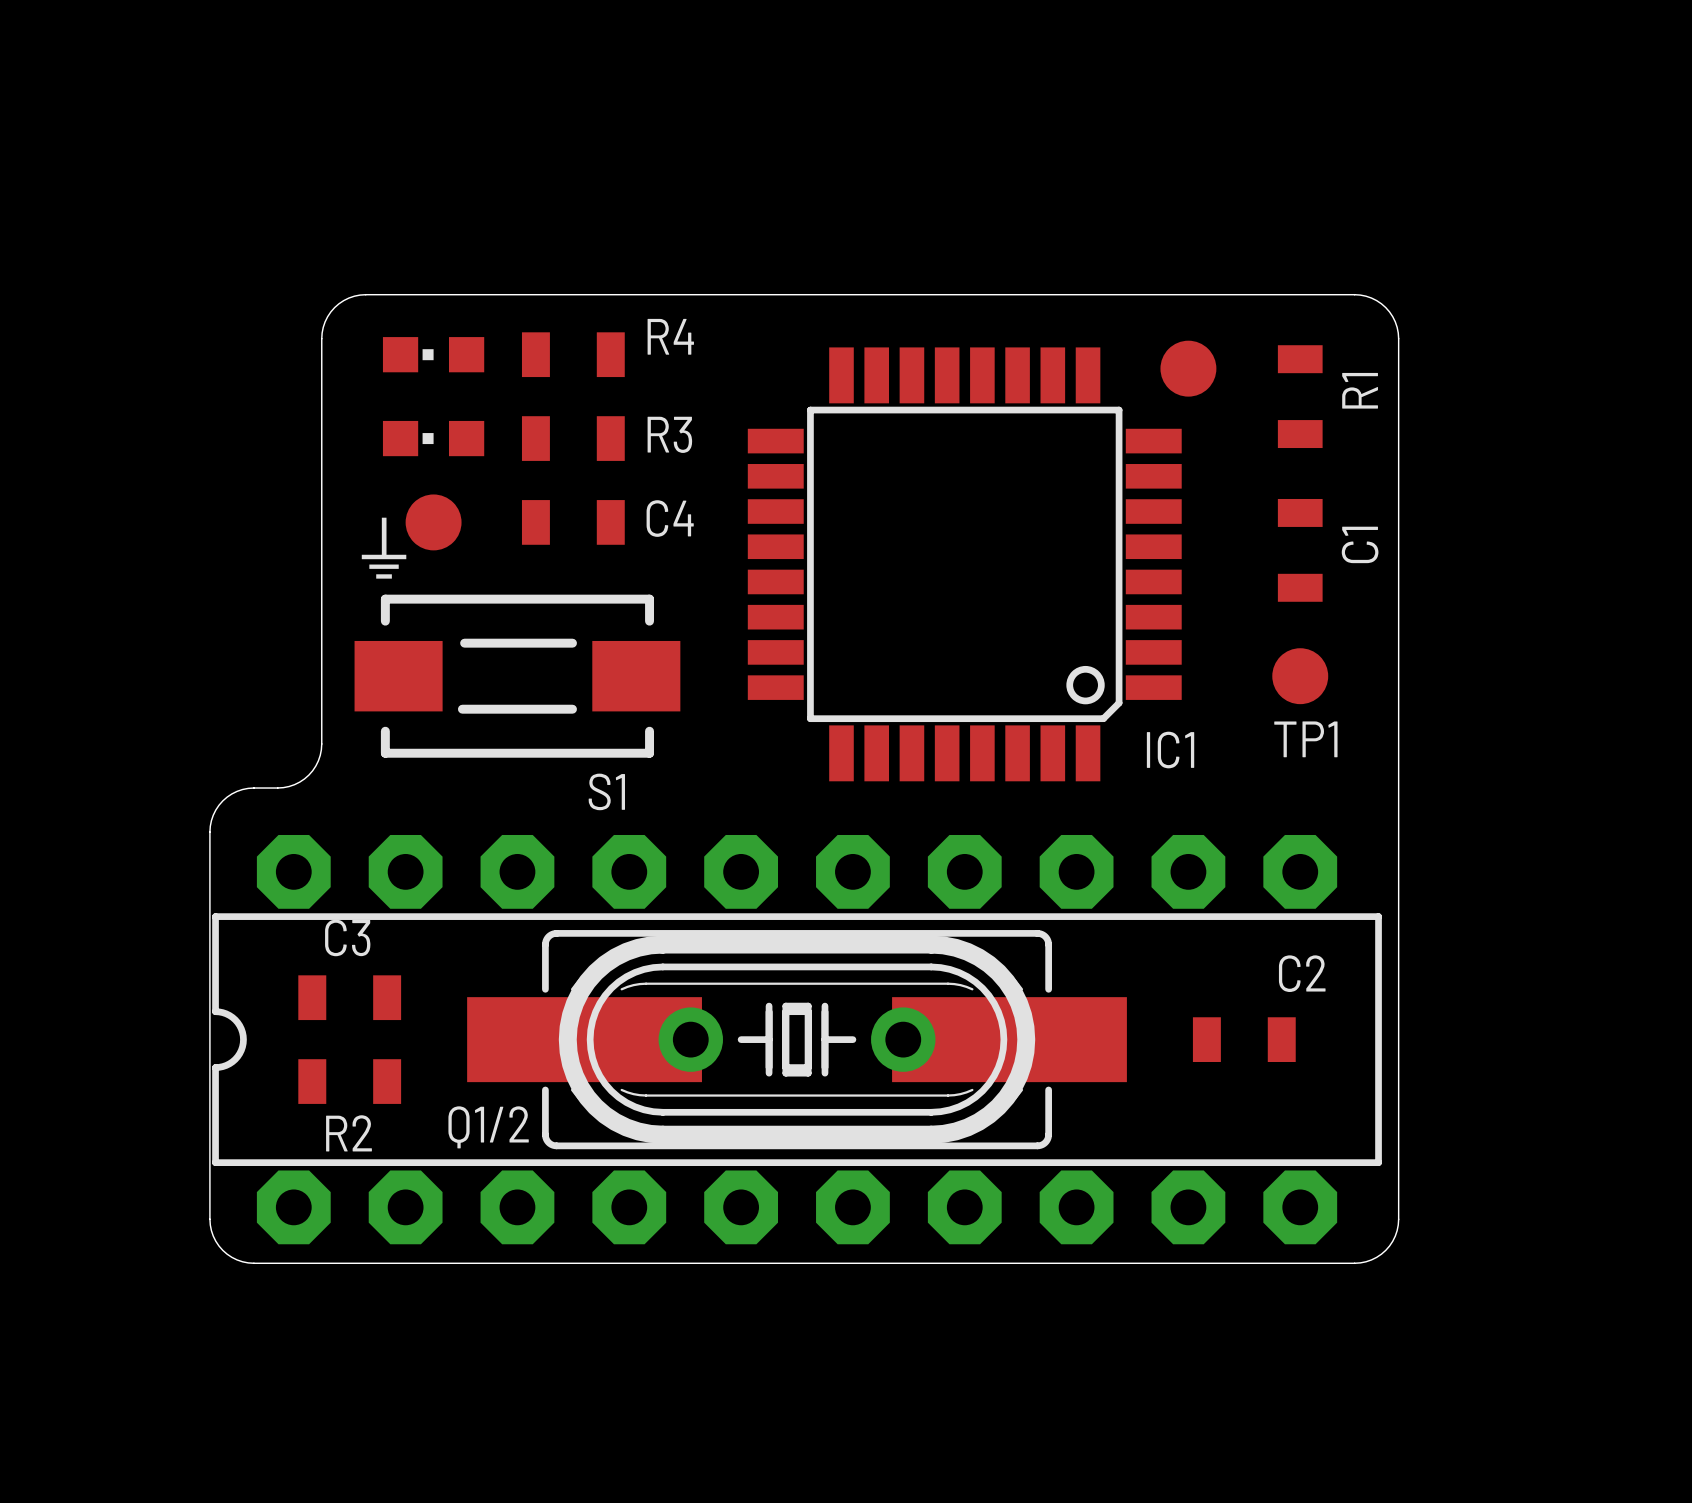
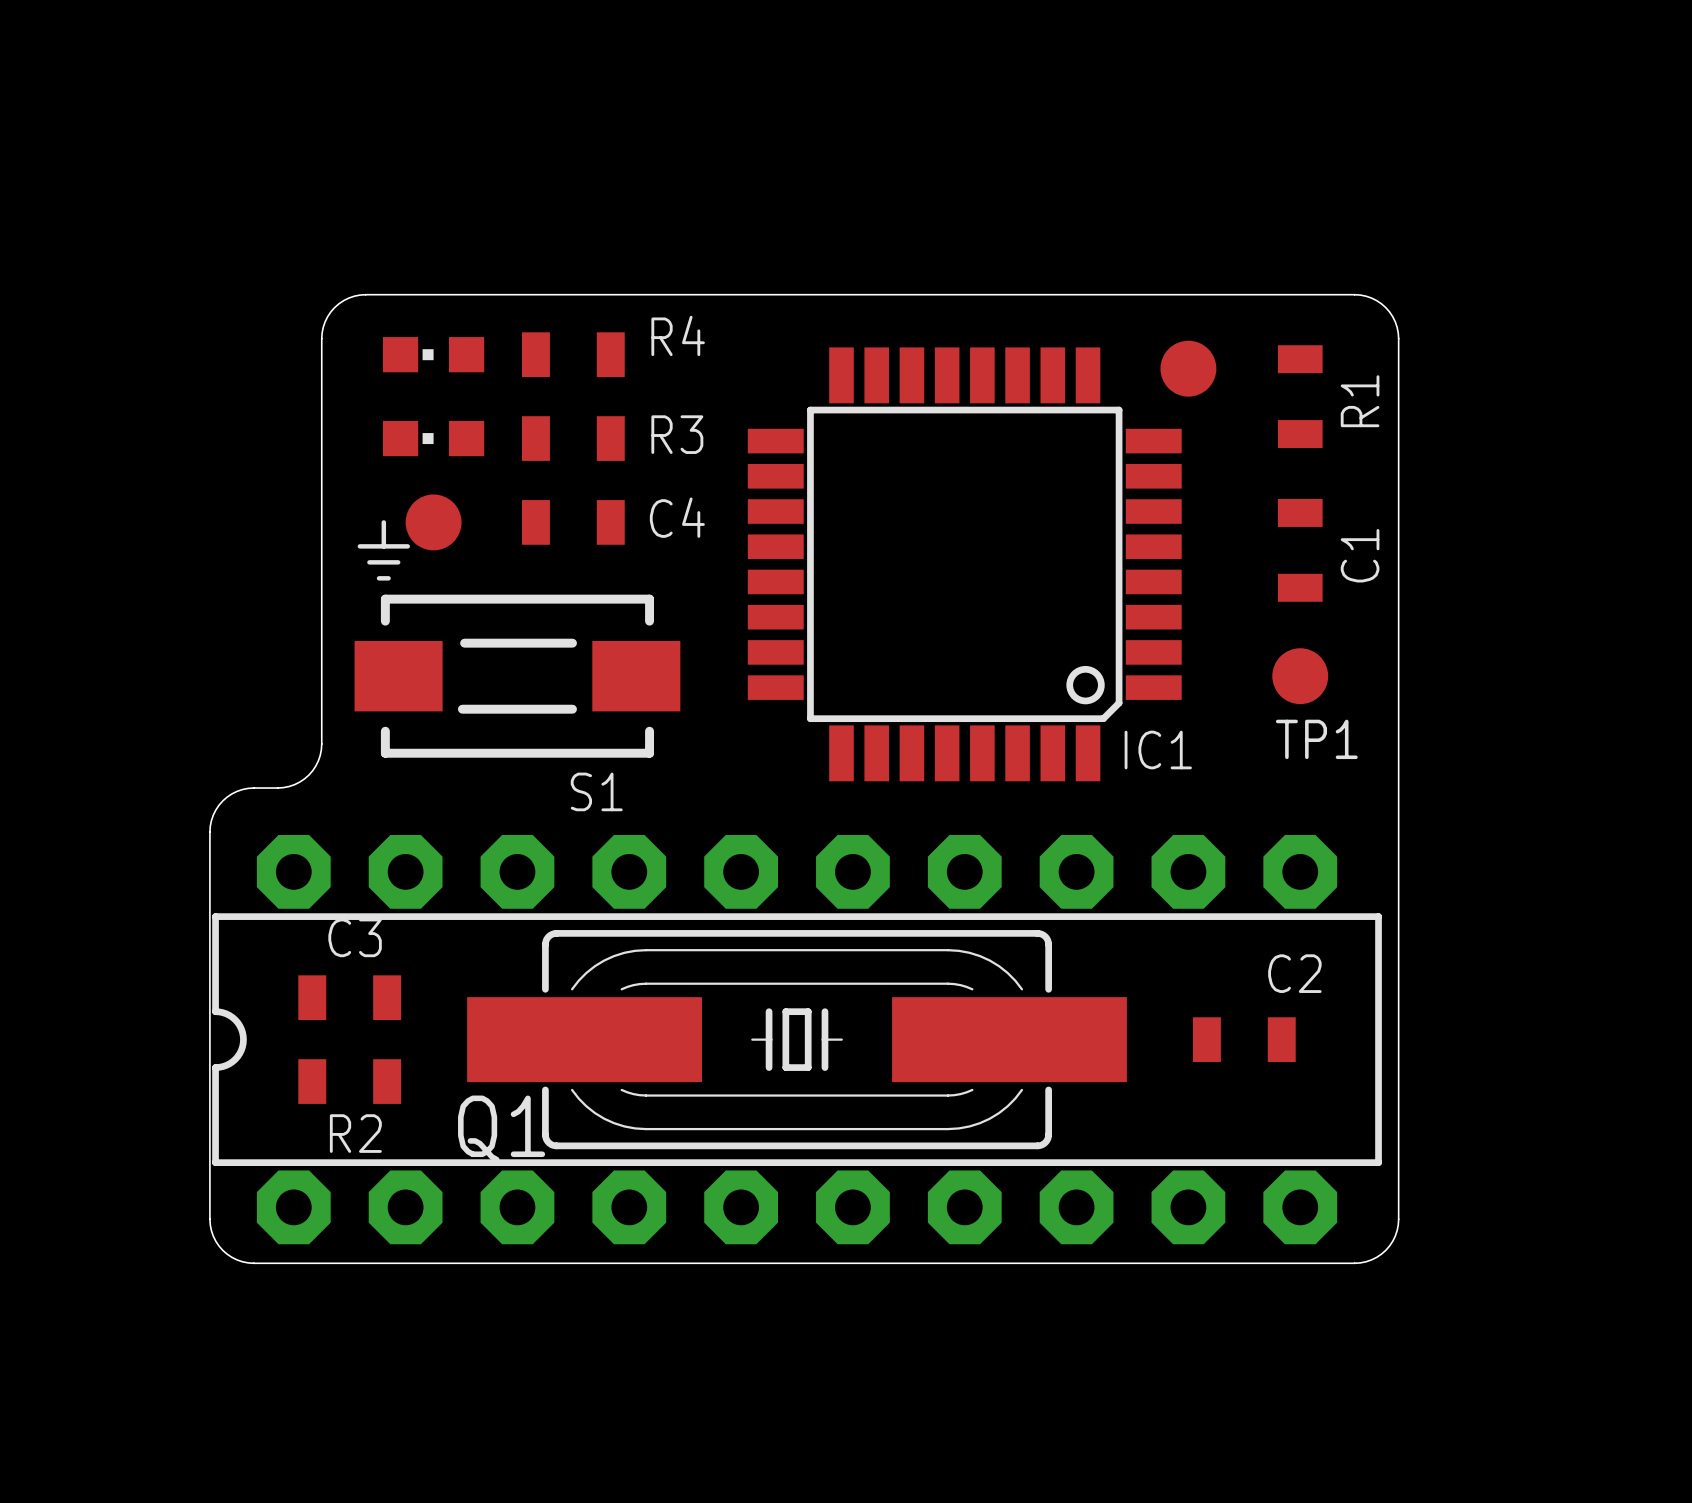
part: (797, 1039) -> none
Q1/2 name: Q1/2 (488, 1127) -> Q1 (501, 1128)

